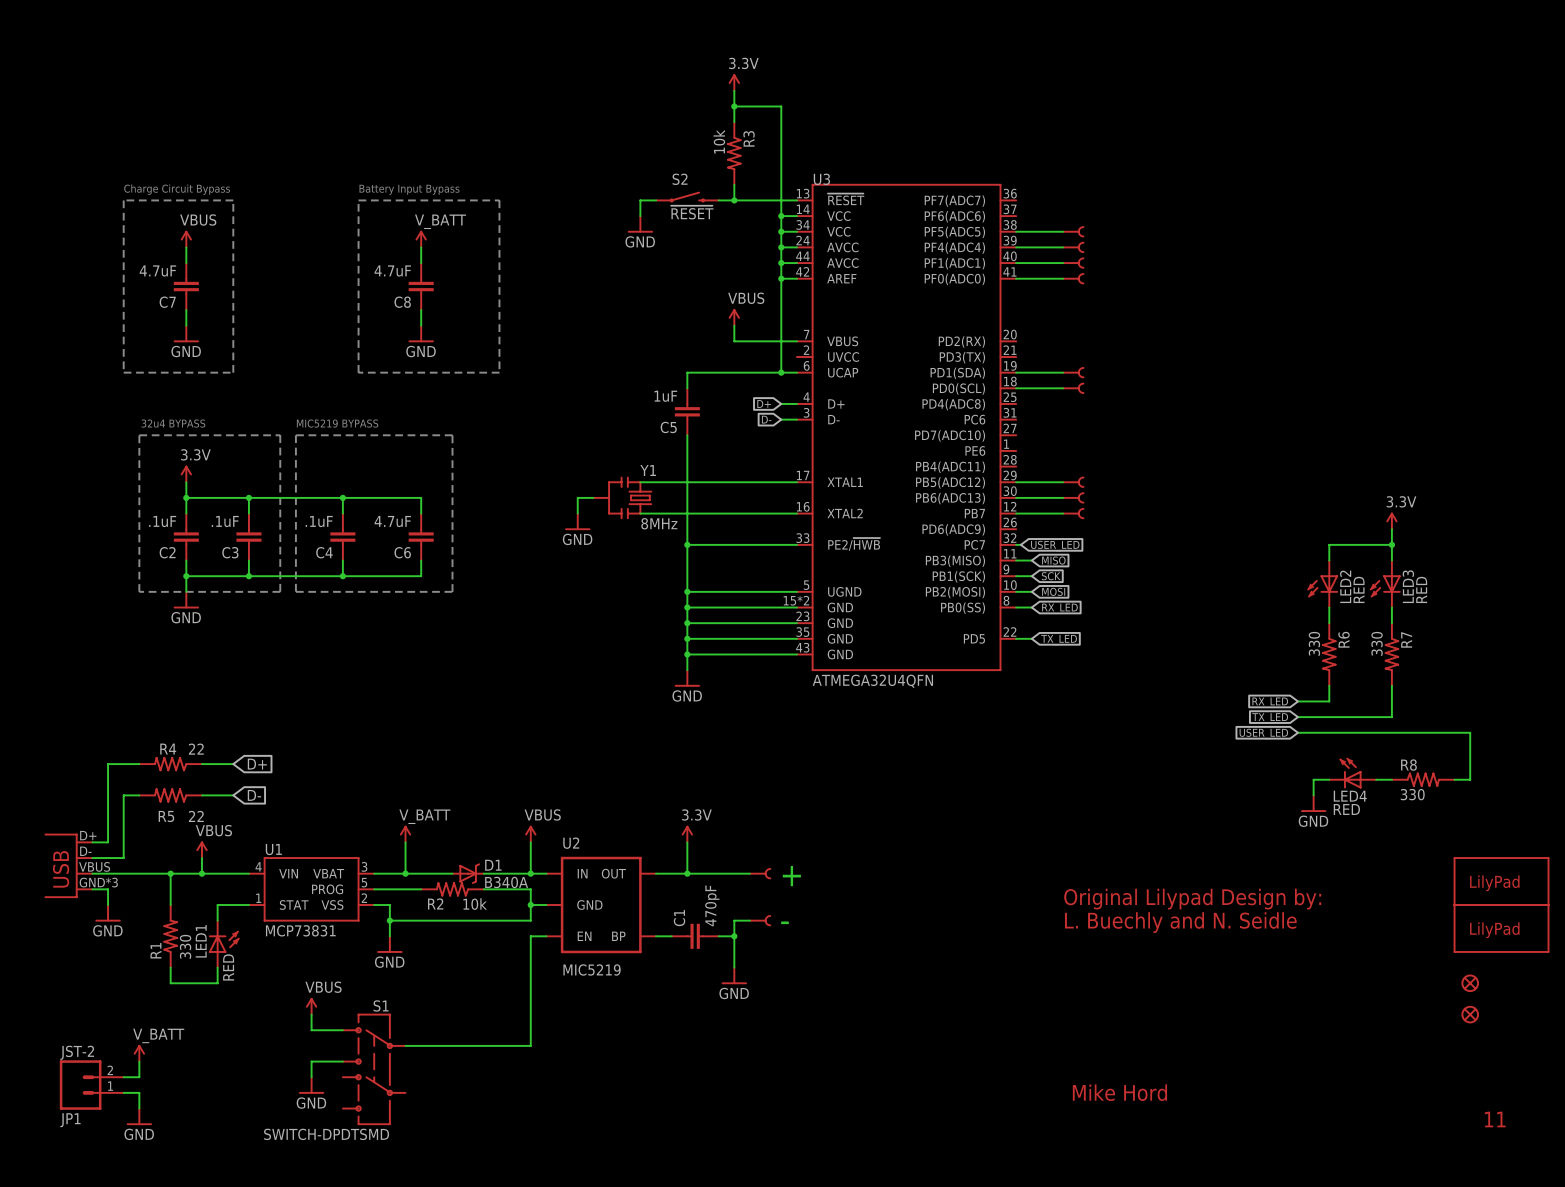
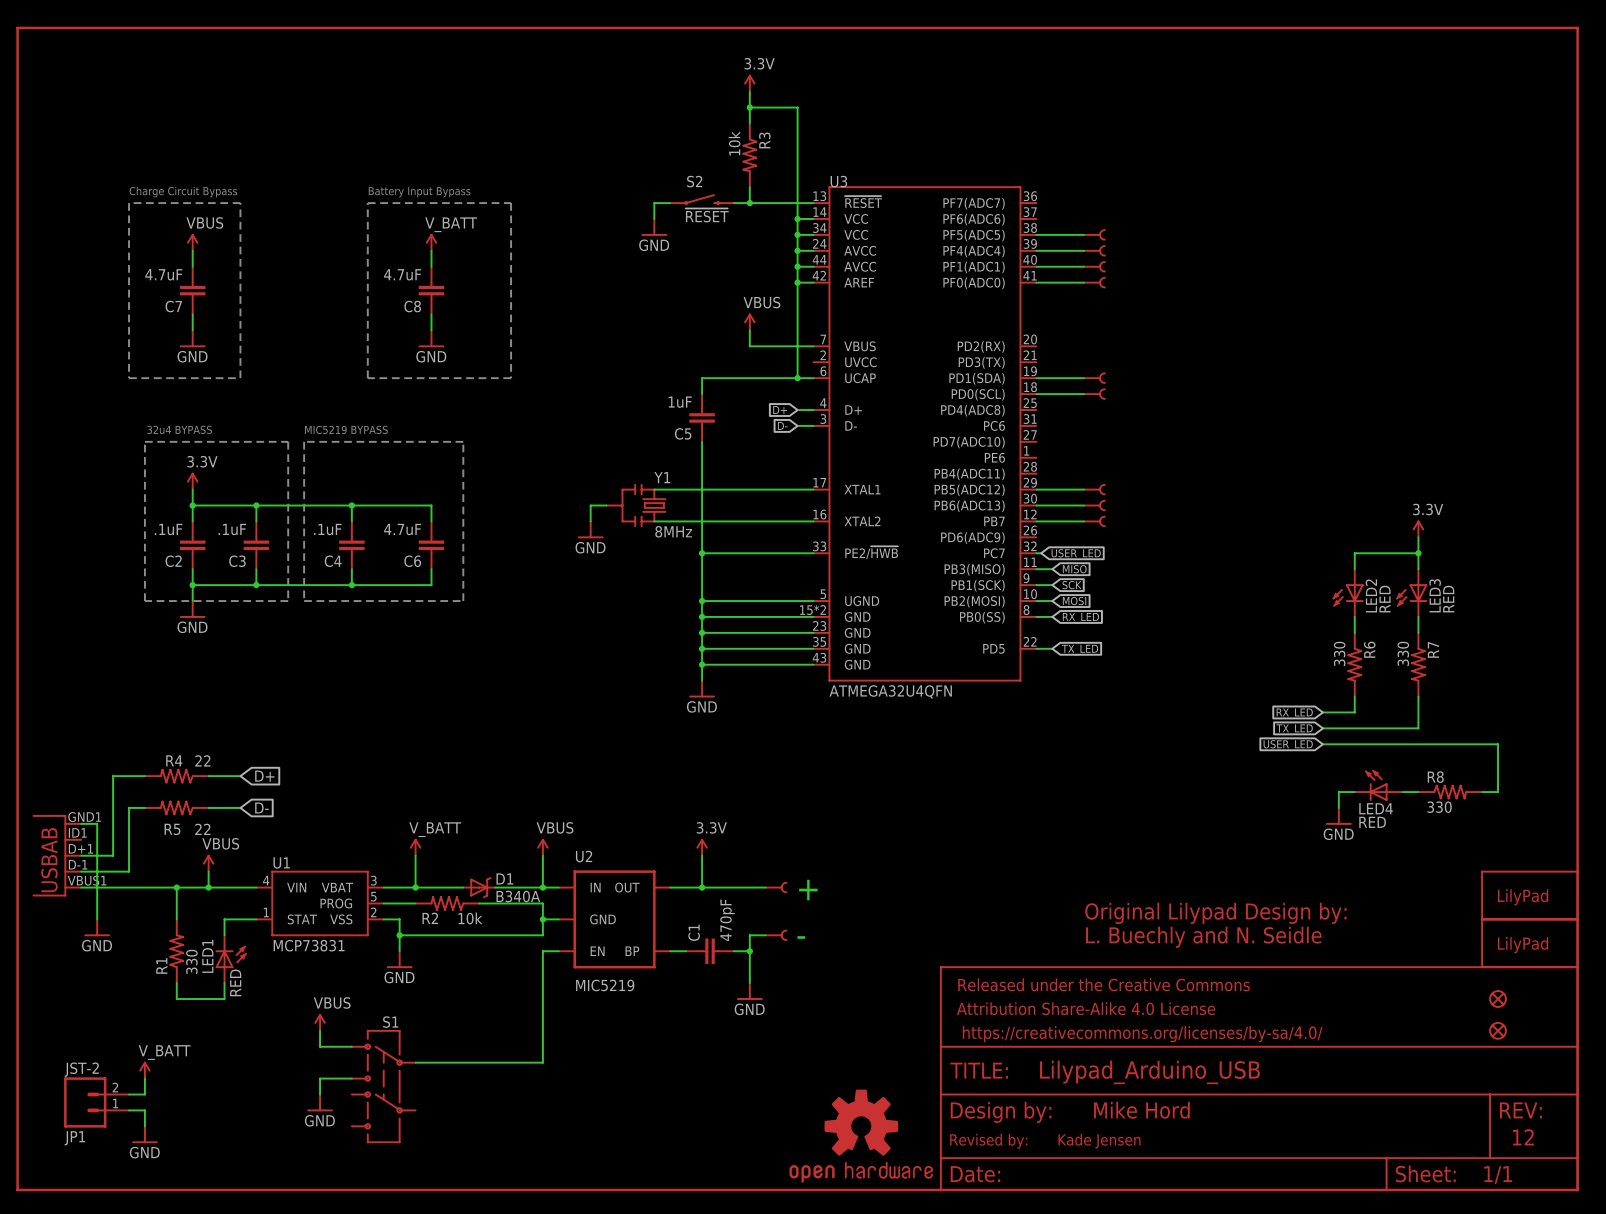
part: none -> (797, 608)
wire: none -> (81, 823) (97, 823) (97, 919)
part: none -> (56, 855)
part: (68, 865) -> none
wire: (92, 889) (108, 889) (108, 905) -> none
R2 position: (452, 889) -> (447, 903)
power symbol position: GND (108, 913) -> GND (97, 927)
part: none -> (1259, 1078)
part: none -> (861, 1136)
text: 11 (1495, 1119) -> 12 (1523, 1137)
text: none -> Revised by: (988, 1141)
text: none -> Kade Jensen (1099, 1141)
S1 value: SWITCH-DPDTSMD (326, 1134) -> none

